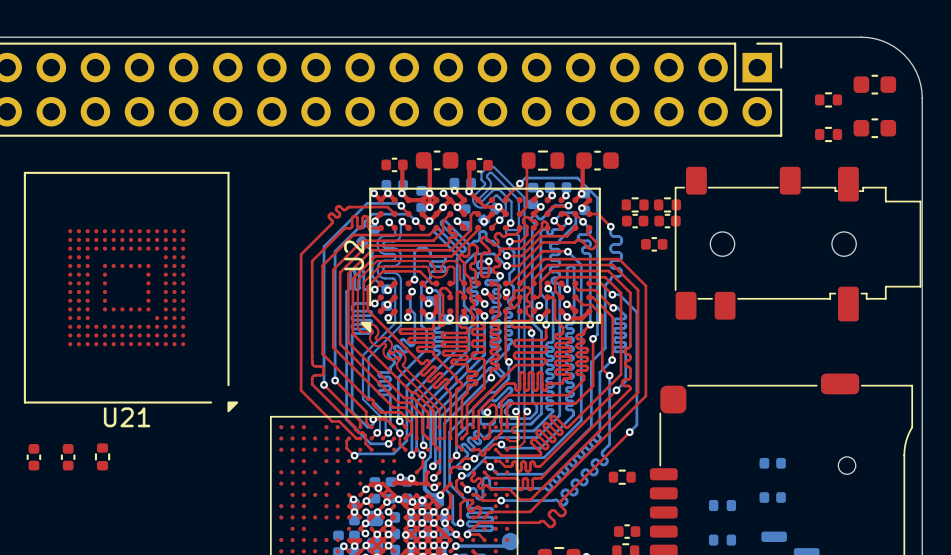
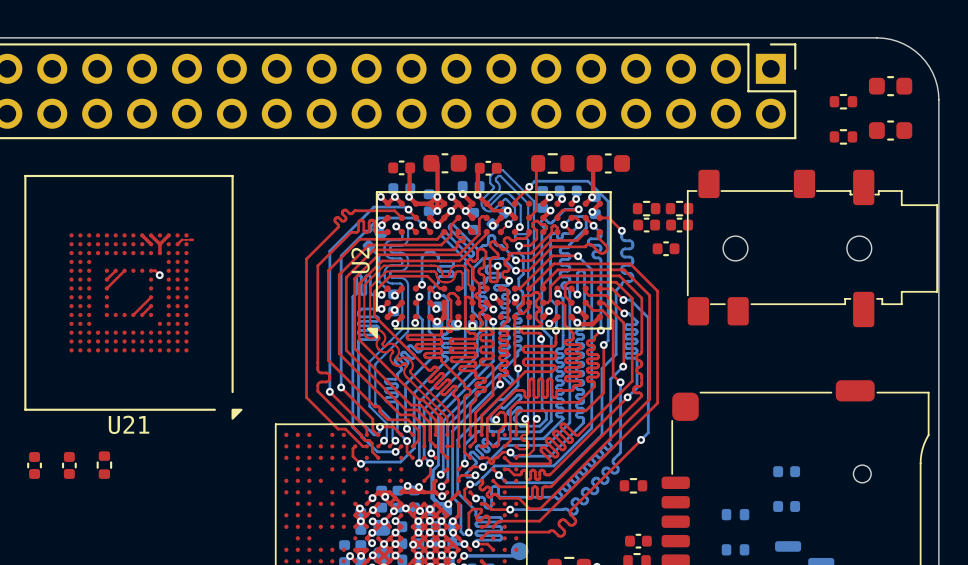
top track: none -> (142, 235) (151, 244)
top track: none -> (151, 235) (159, 244)
top track: none -> (168, 235) (159, 244)
top track: none -> (192, 239) (182, 239) (177, 244)
top track: none -> (159, 244) (159, 253)
top track: none -> (115, 270) (106, 279)
top track: none -> (124, 270) (106, 288)
top track: none -> (151, 270) (155, 270) (159, 275)
via: none -> (159, 275)
top track: none -> (151, 297) (133, 314)
top track: none -> (151, 306) (142, 314)

